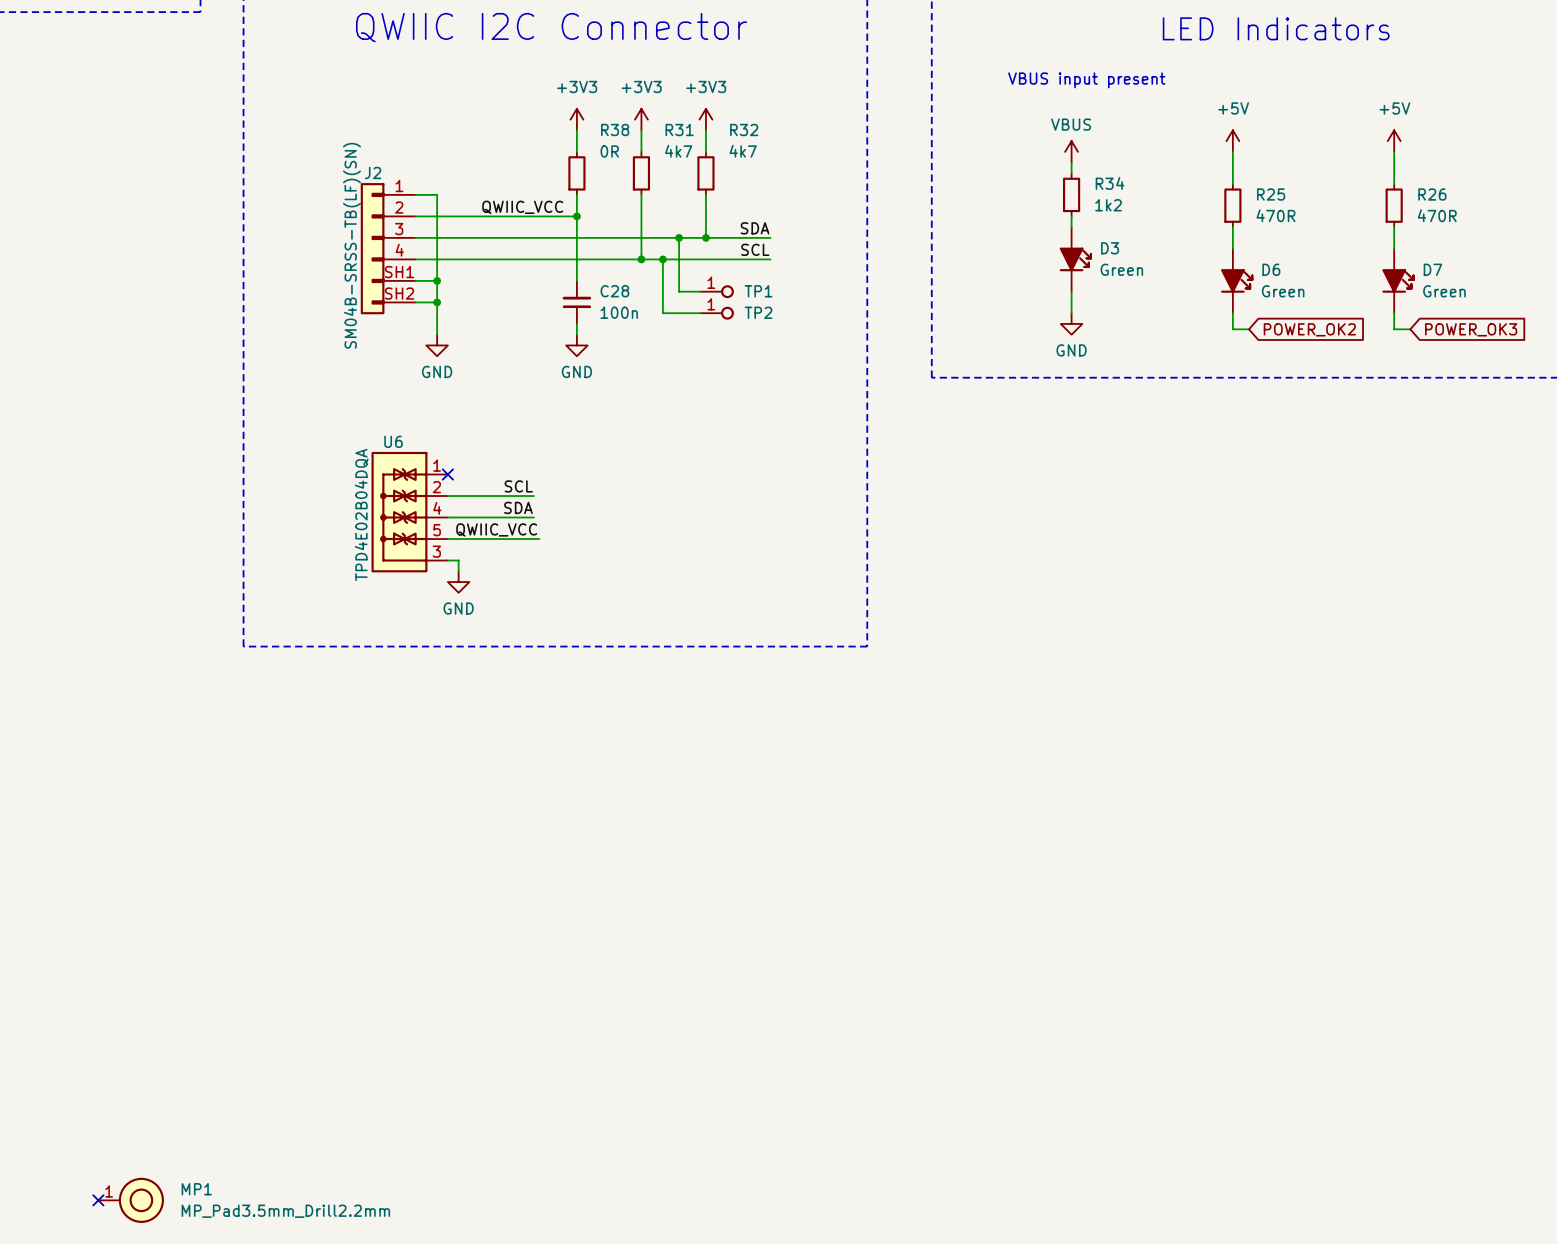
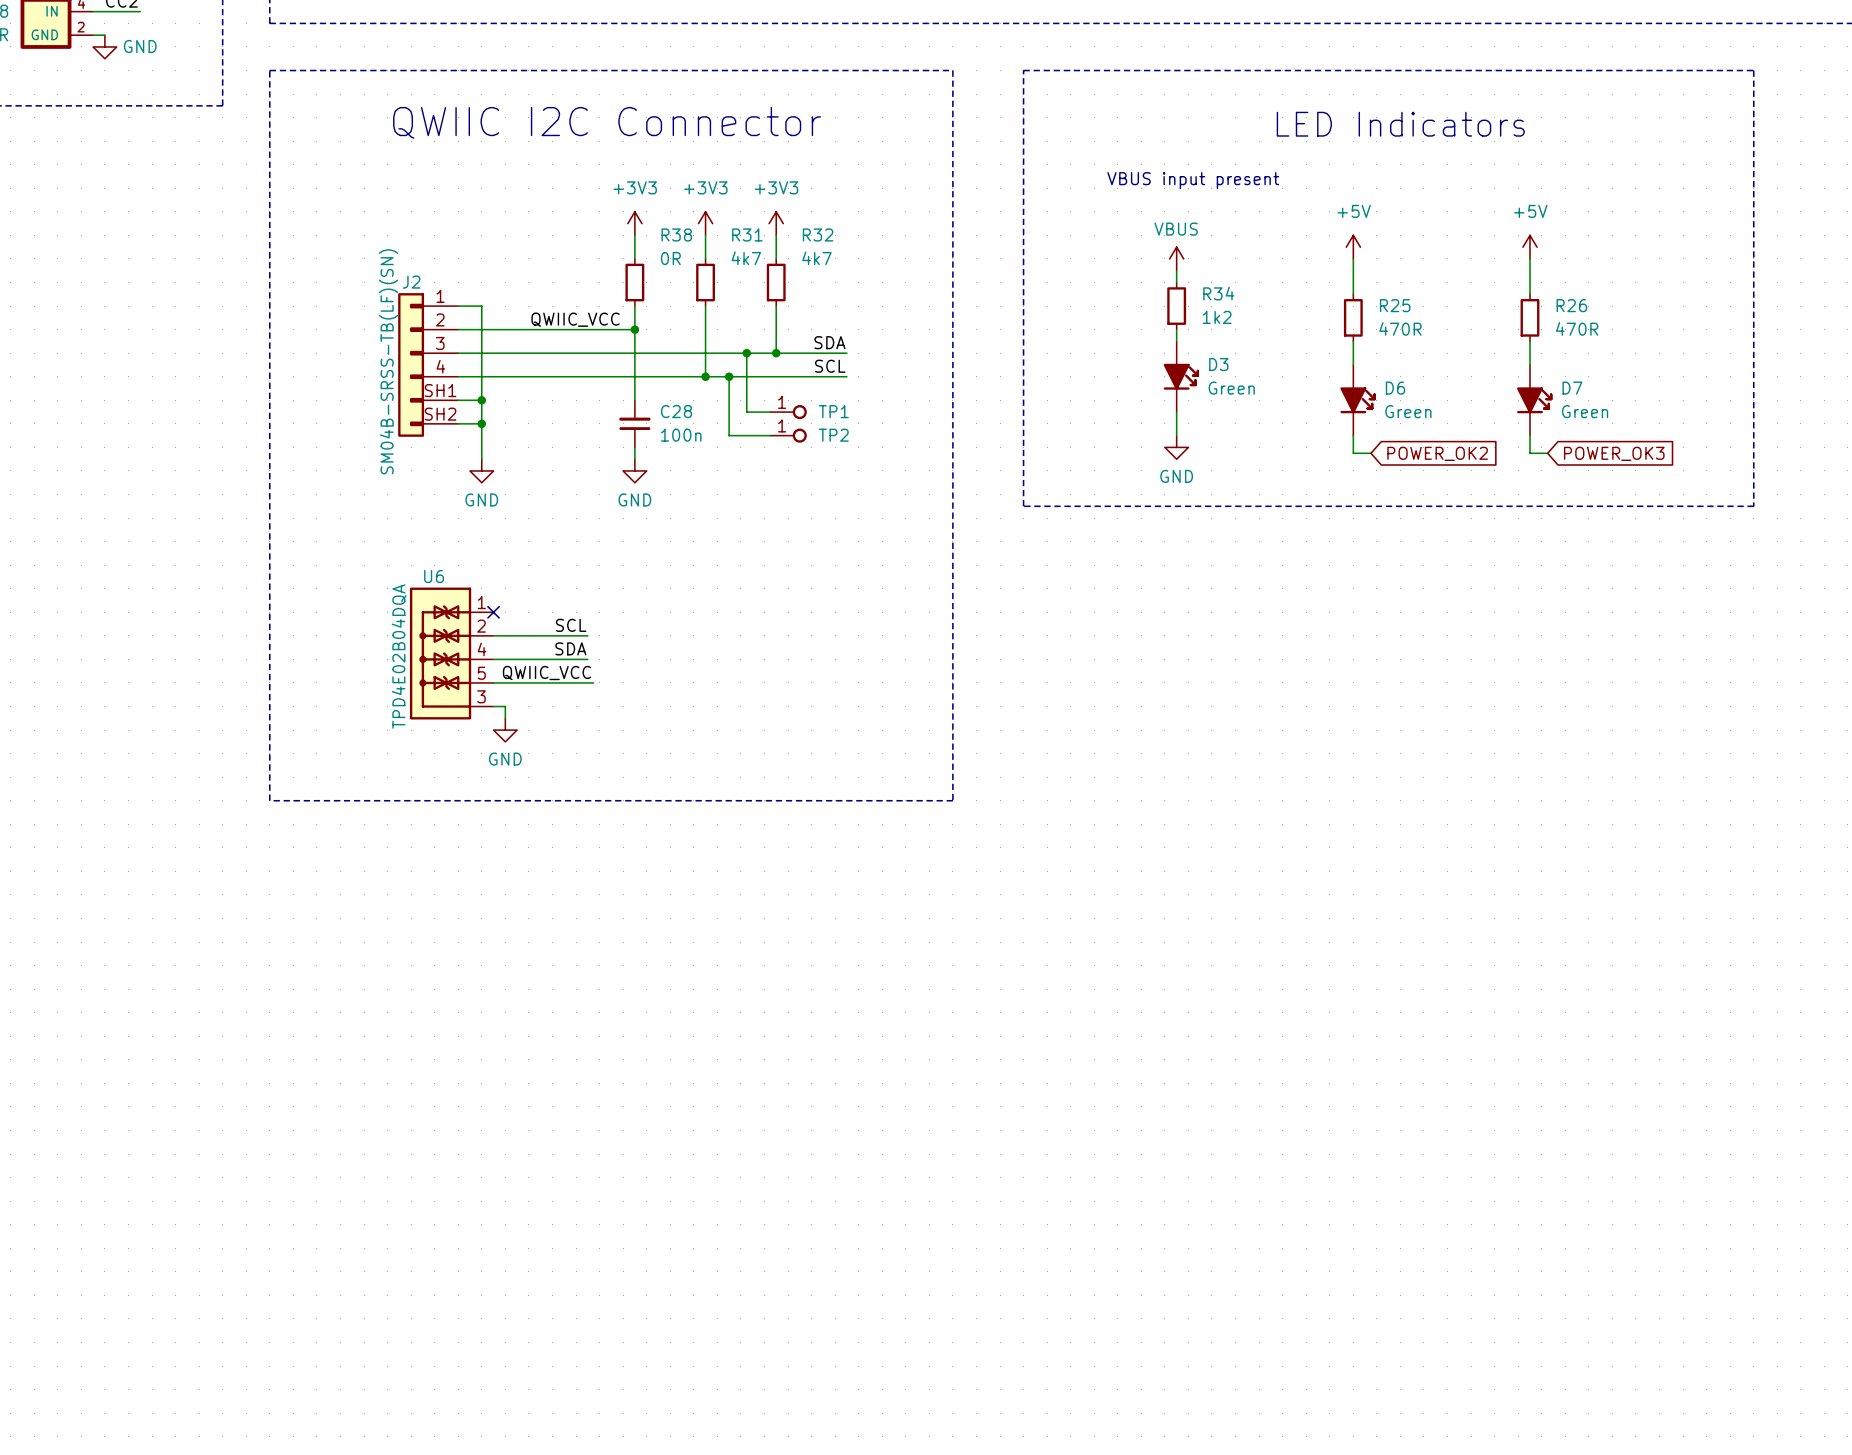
no-connect mark: (98, 1200) -> none
MP1: MP_Pad3.5mm_Drill2.2mm (131, 1200) -> none

